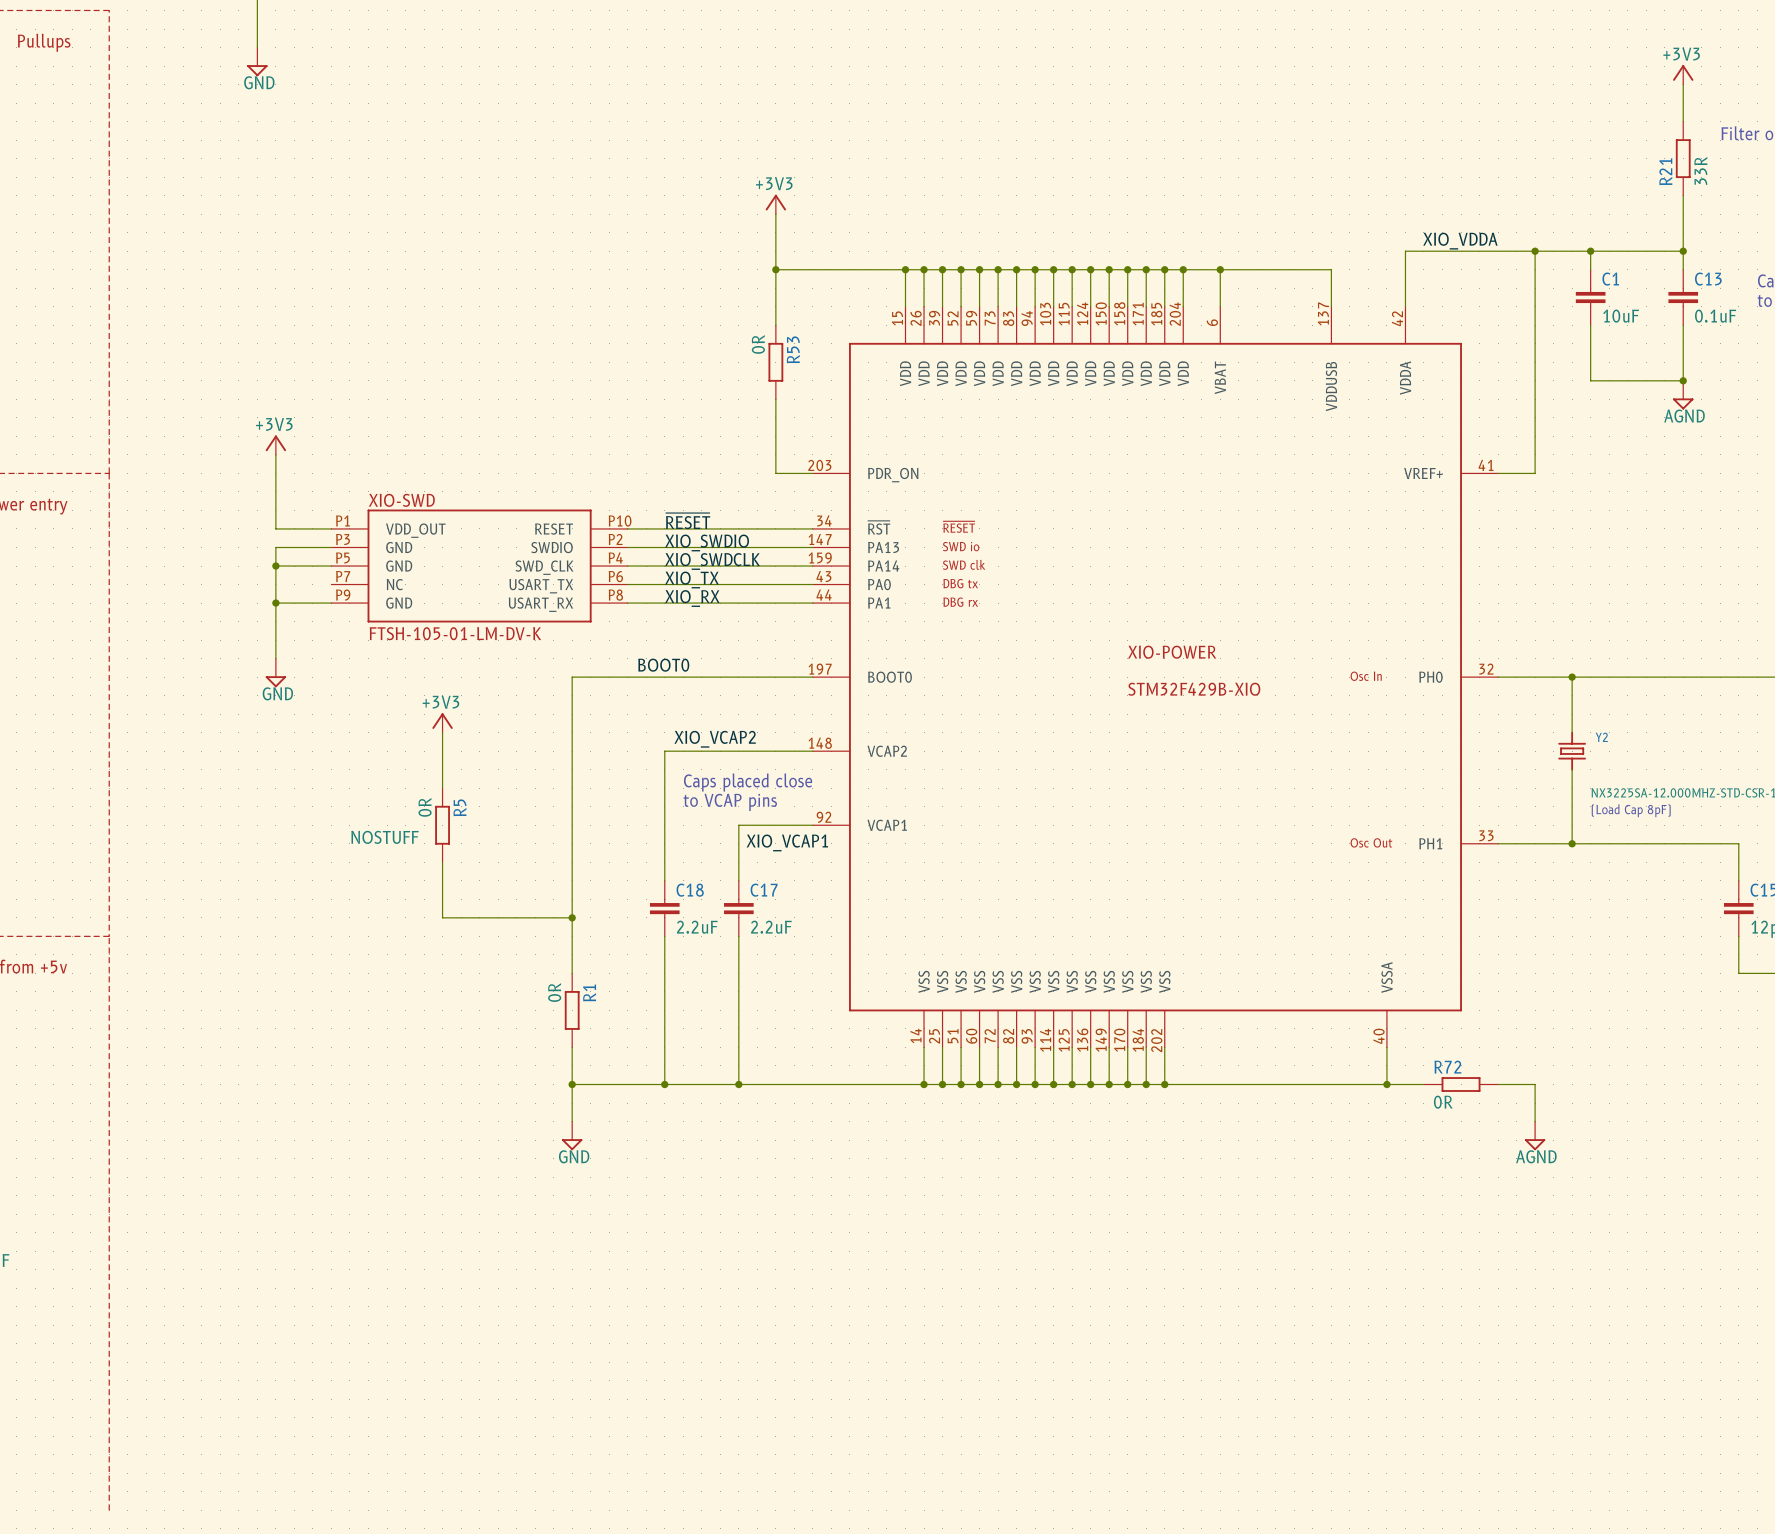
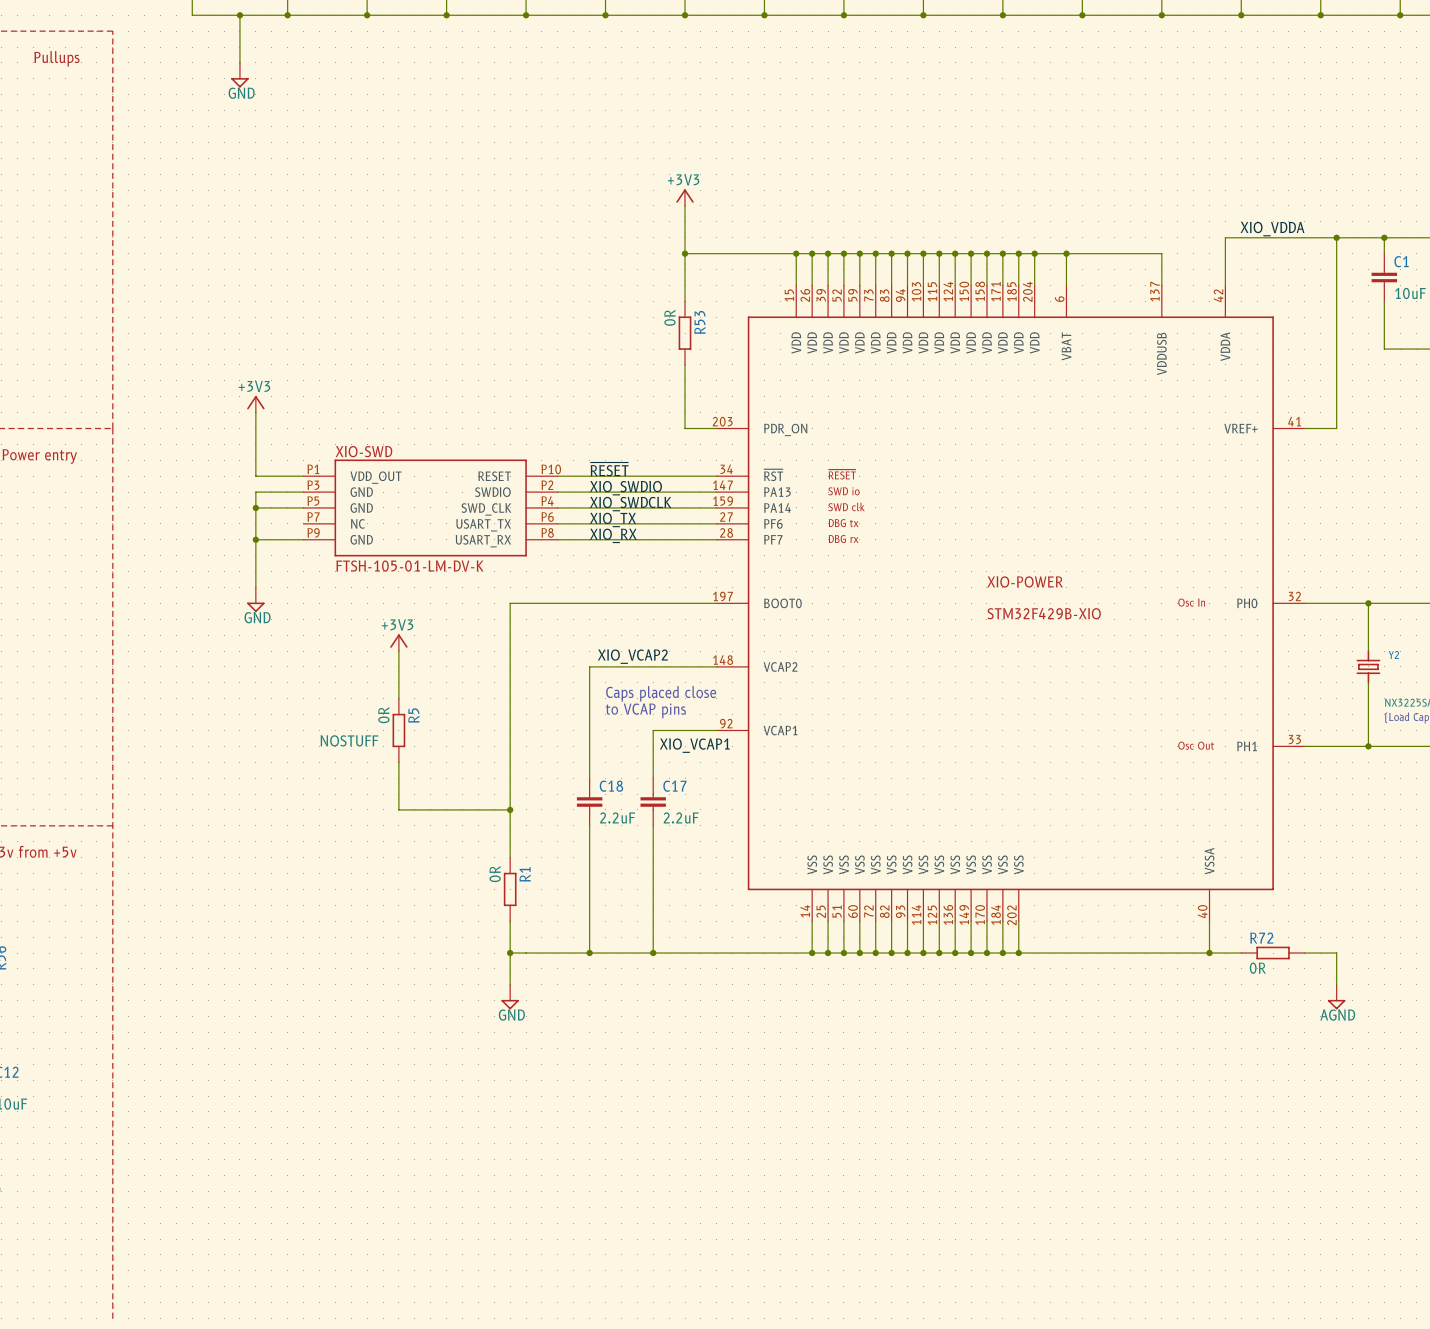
XIO-POWER pin number: 43 (823, 576) -> 27 (726, 517)
XIO-POWER pin name: PA0 (879, 584) -> PF6 (773, 523)
XIO-POWER pin number: 44 (824, 595) -> 28 (726, 532)
XIO-POWER pin name: PA1 (879, 603) -> PF7 (773, 539)
label: BOOT0 (663, 665) -> none

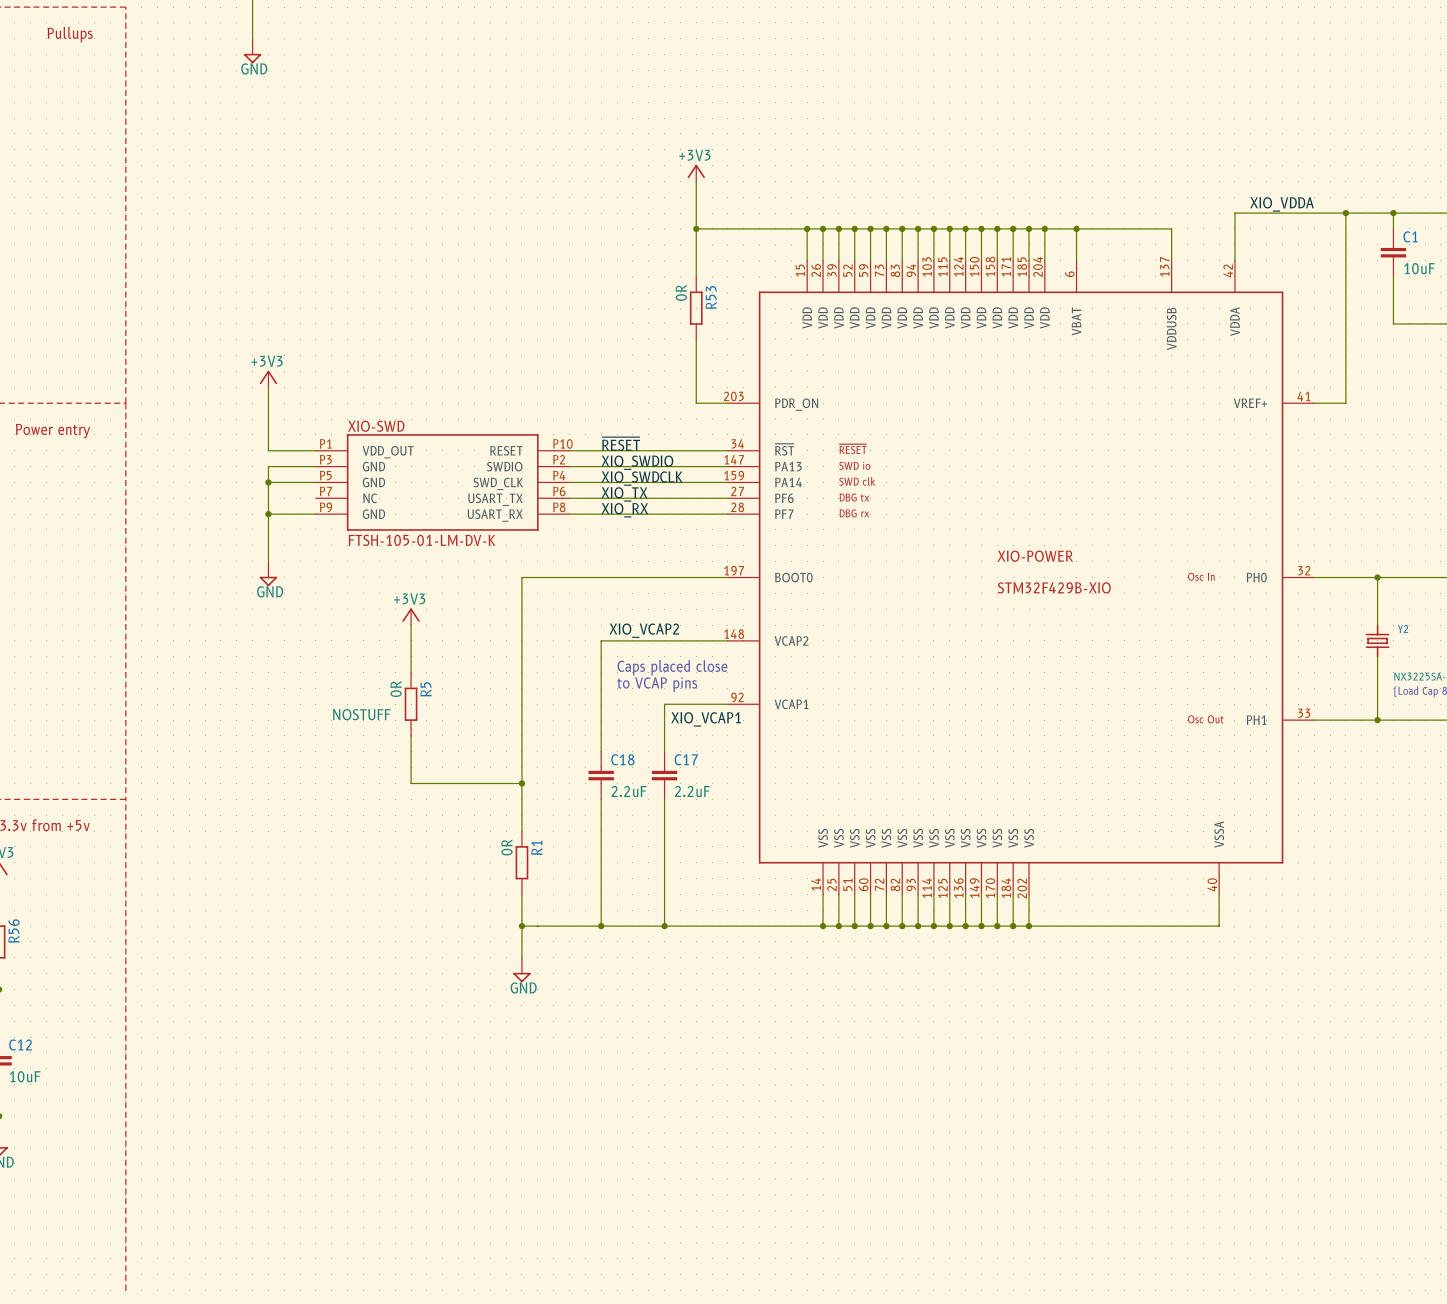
wire: (1209, 953) (1241, 953) -> none
junction: (1209, 953) -> none
R72: 0R (1273, 953) -> none
wire: (1304, 953) (1336, 953) (1336, 984) -> none
power symbol: AGND (1336, 997) -> none

